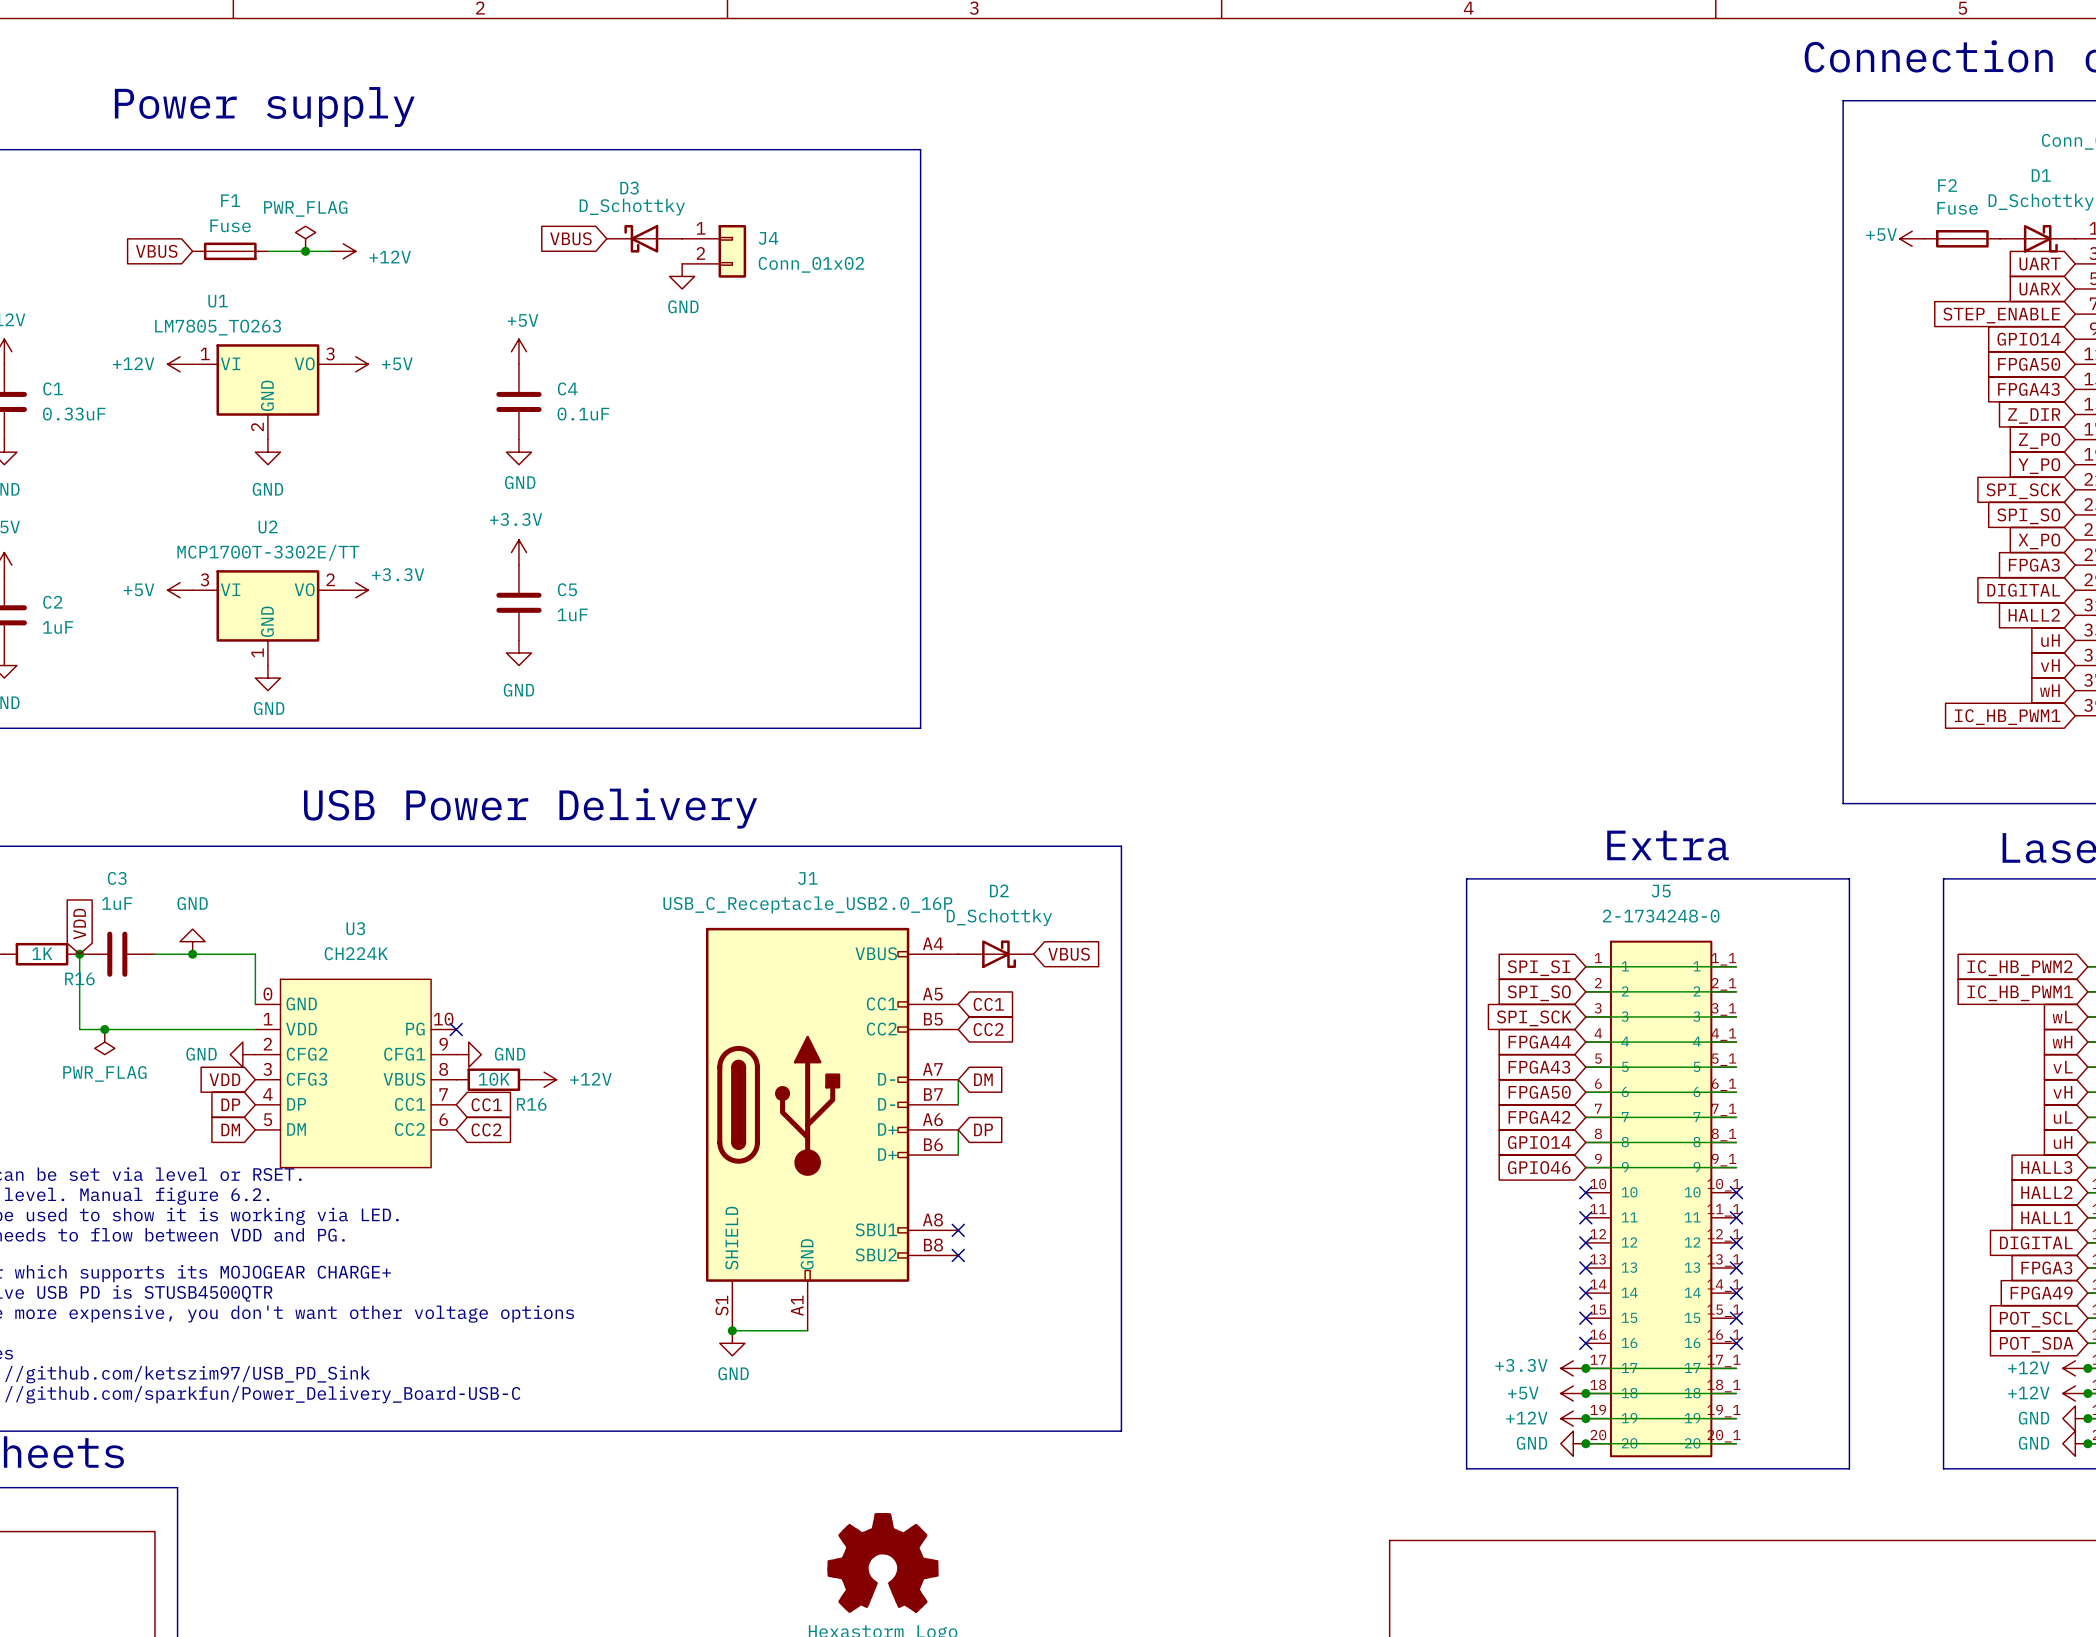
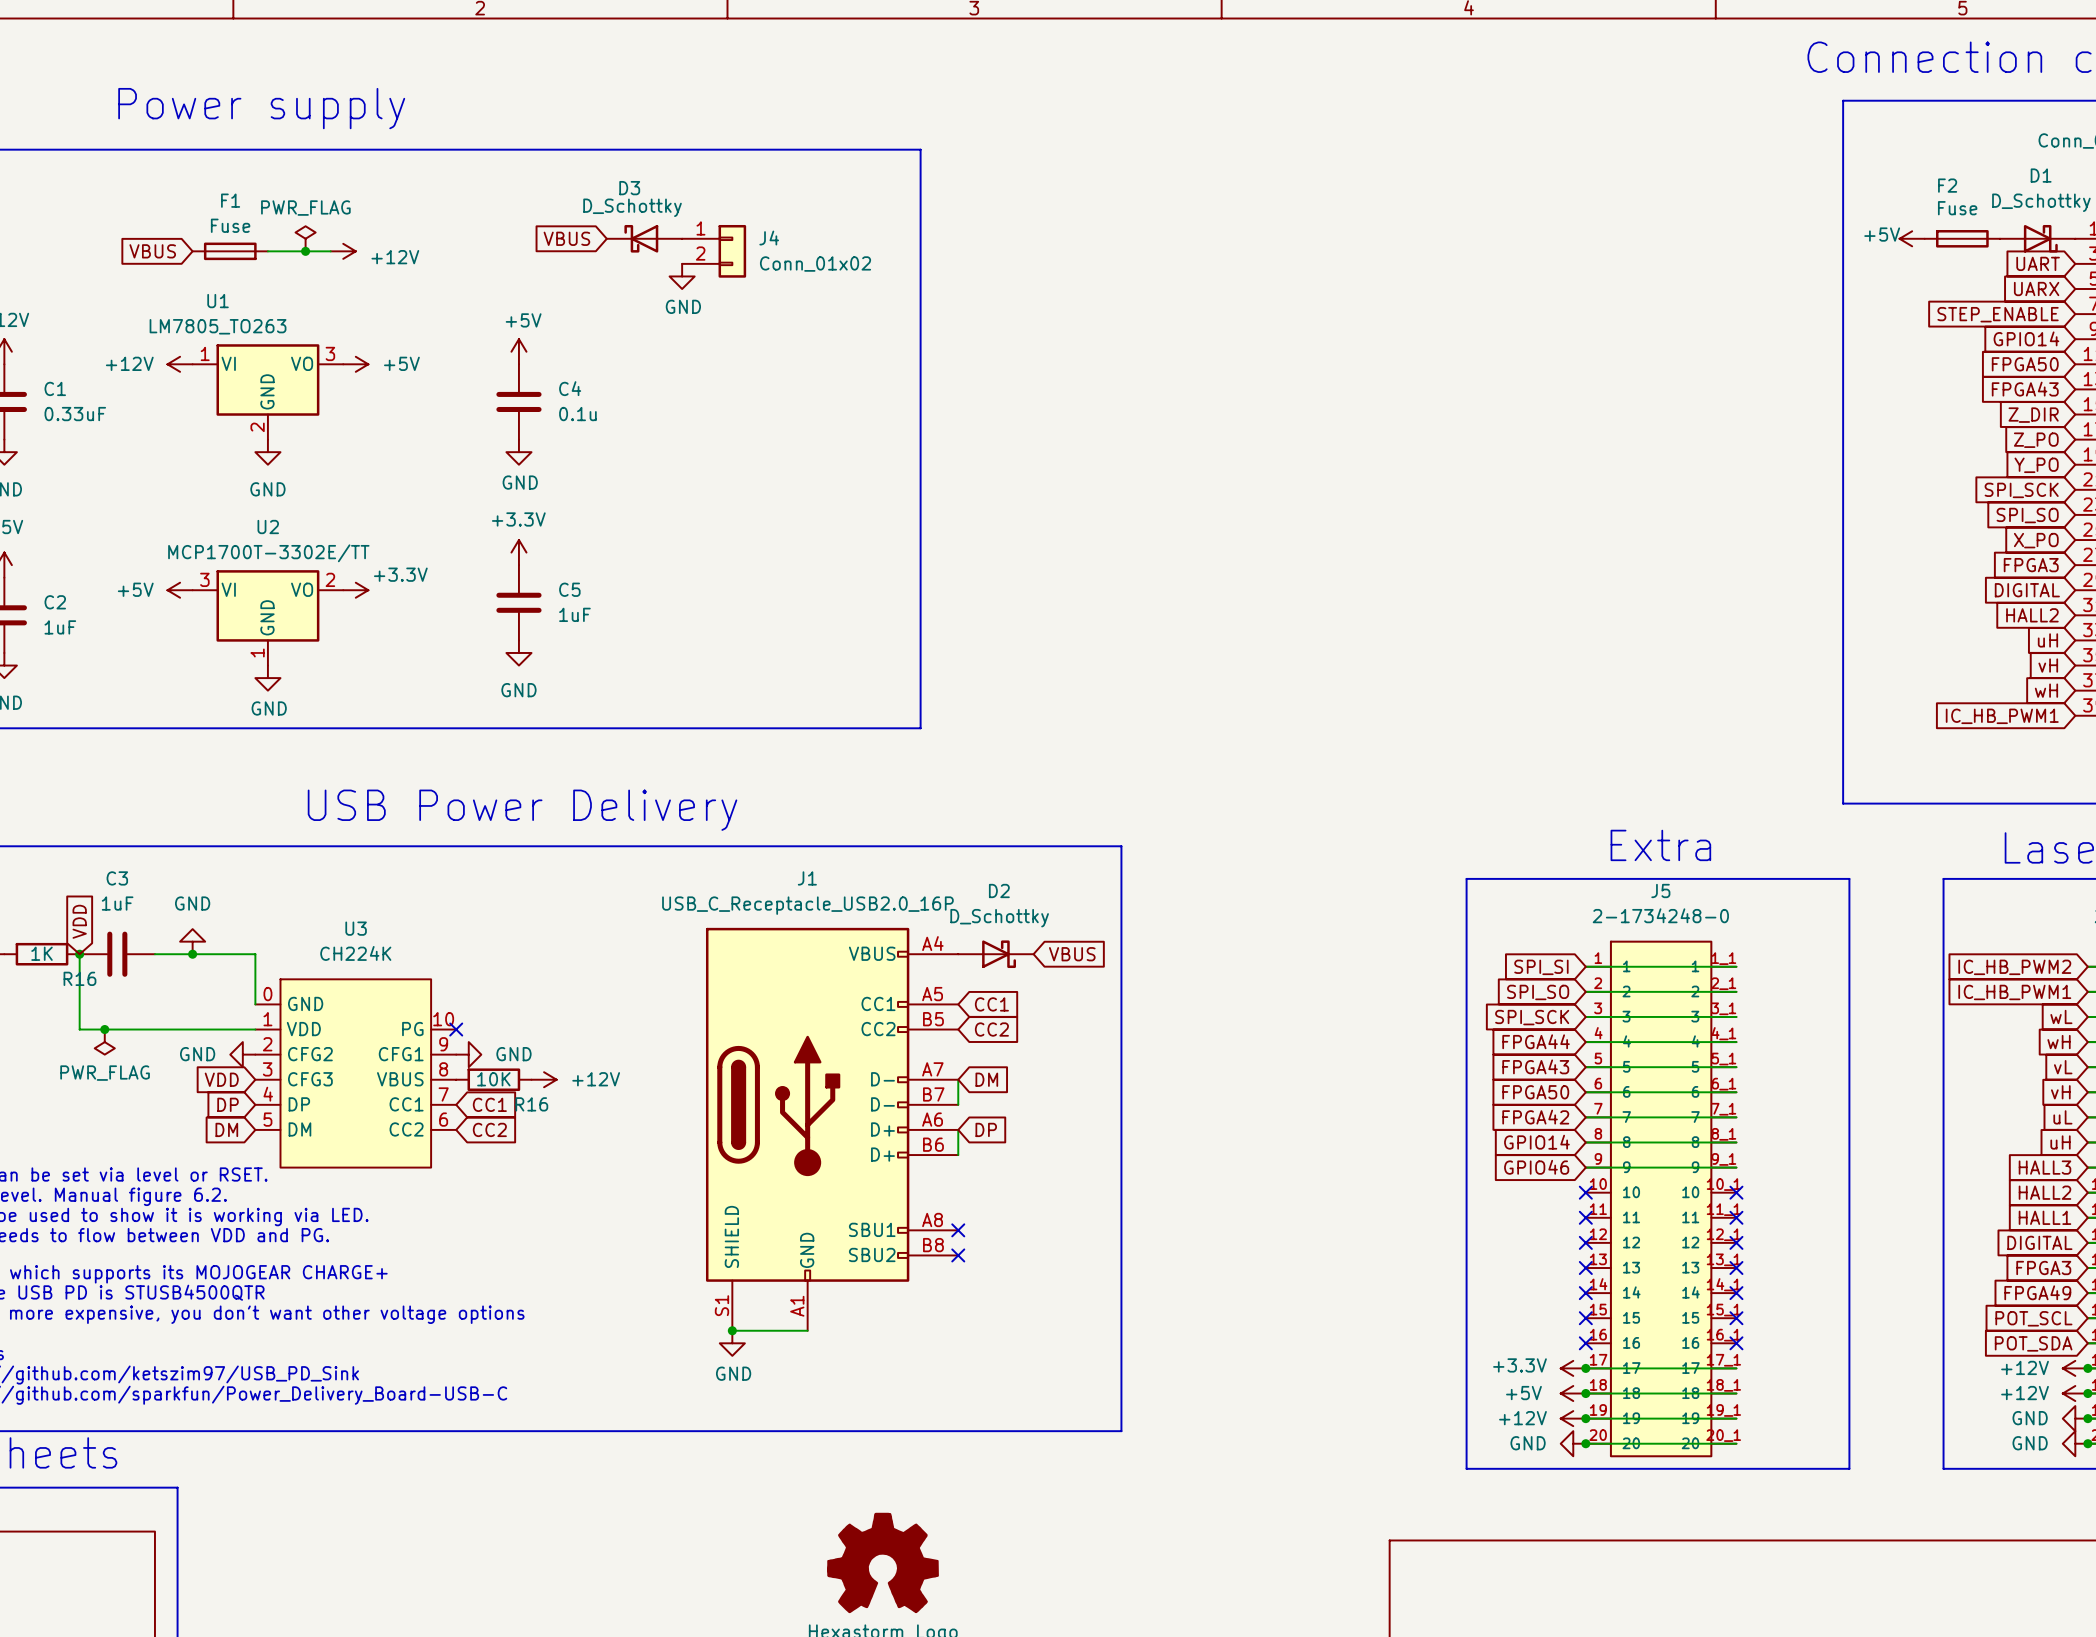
C4 value: 0.1uF (583, 414) -> 0.1u (577, 414)

